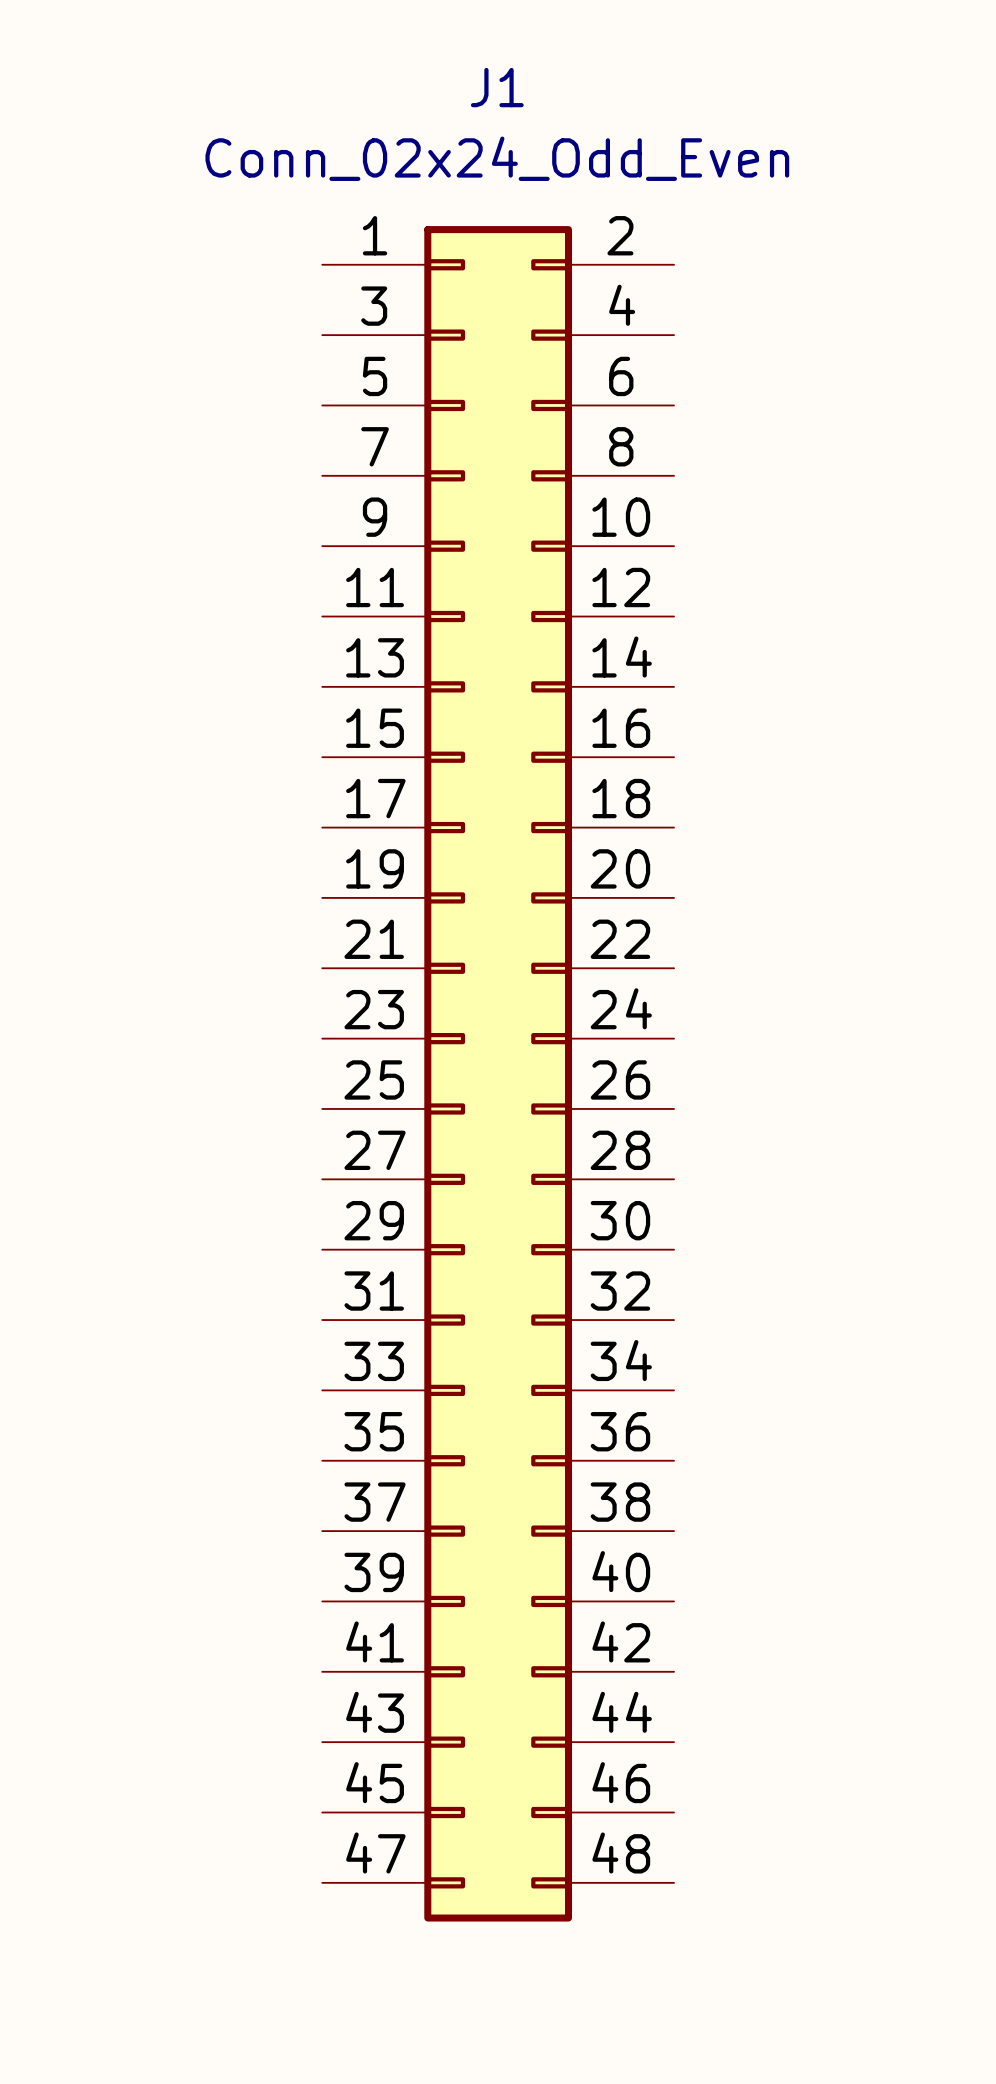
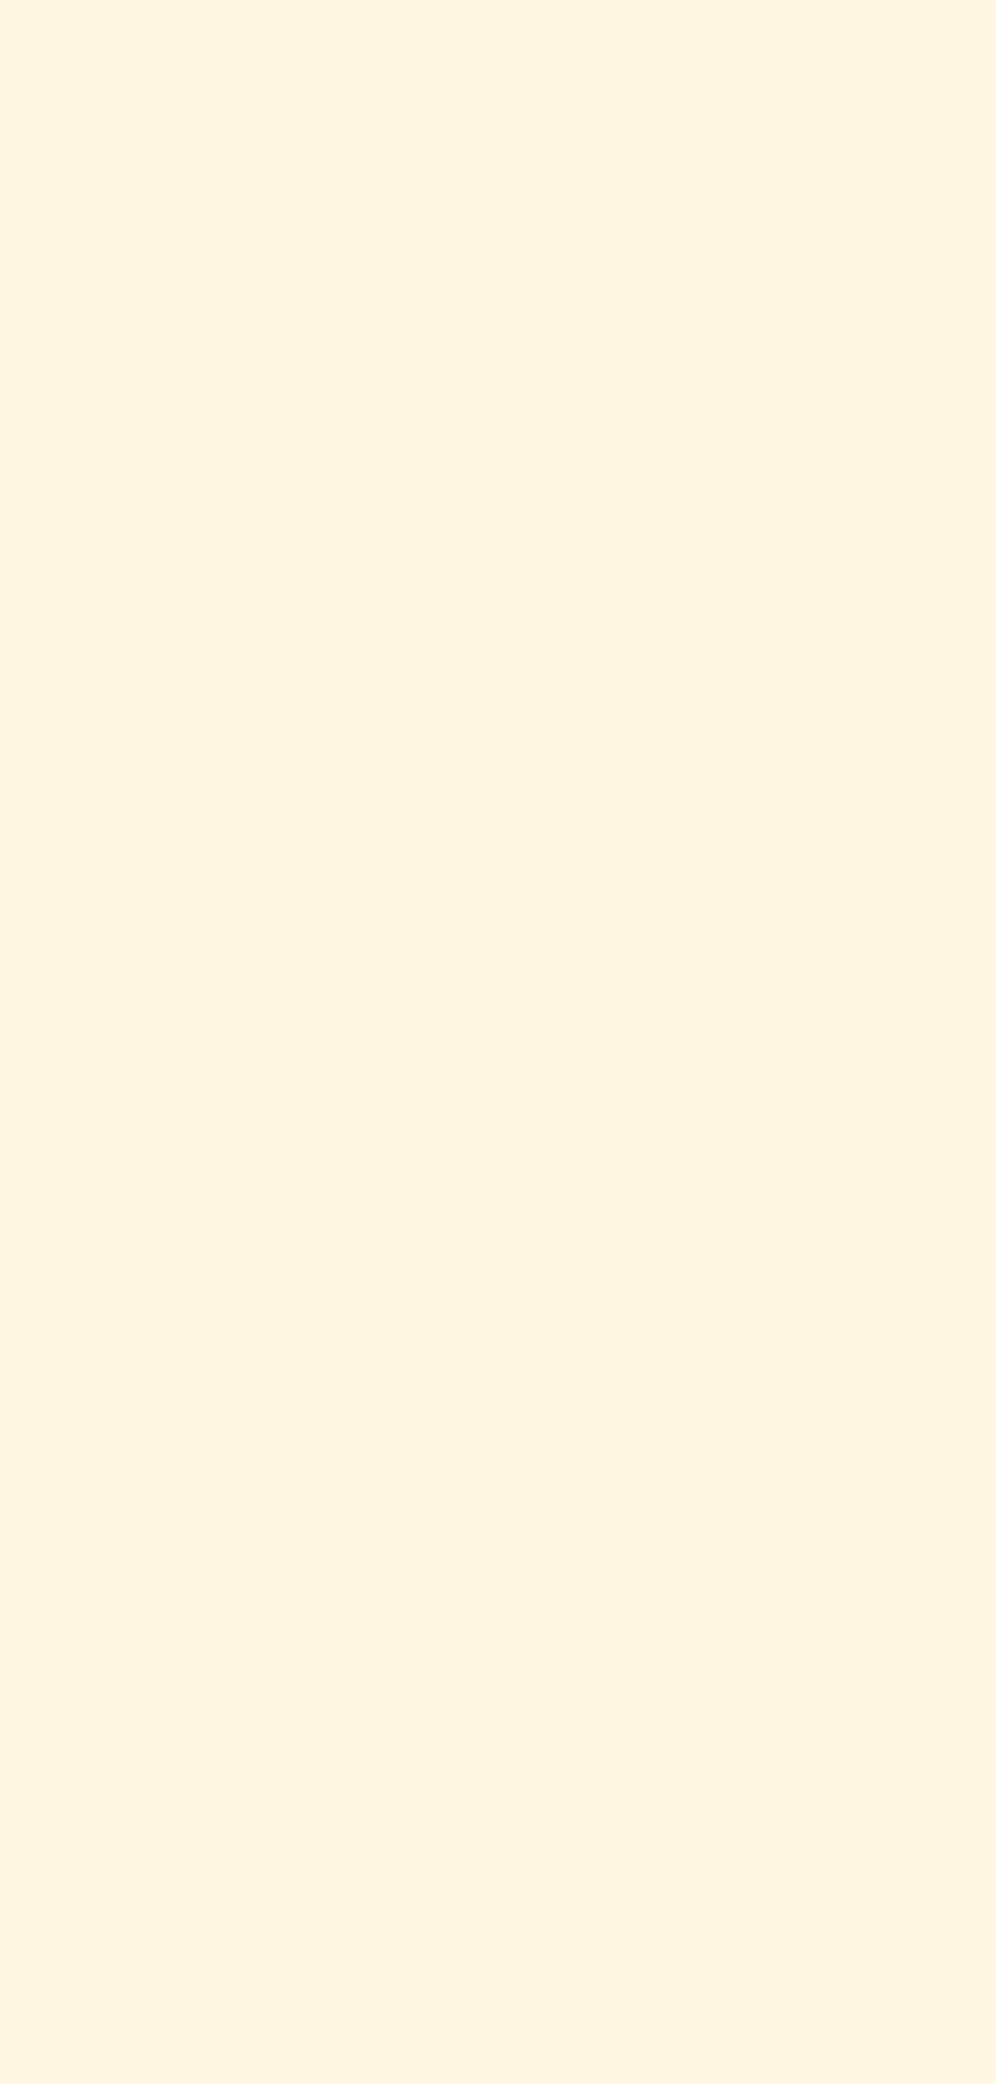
J1: Conn_02x24_Odd_Even (498, 1073) -> none

